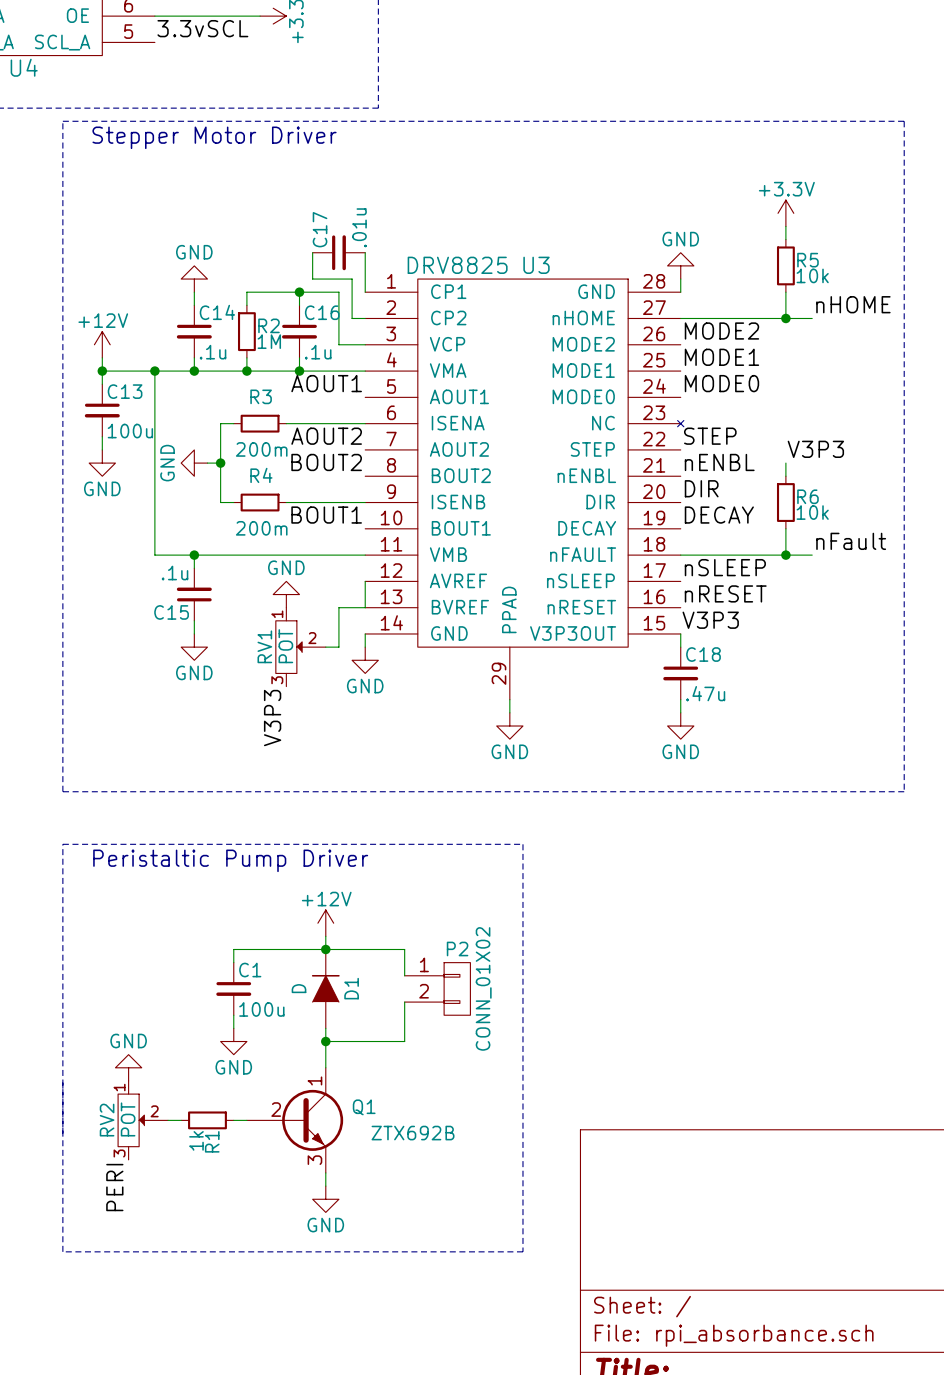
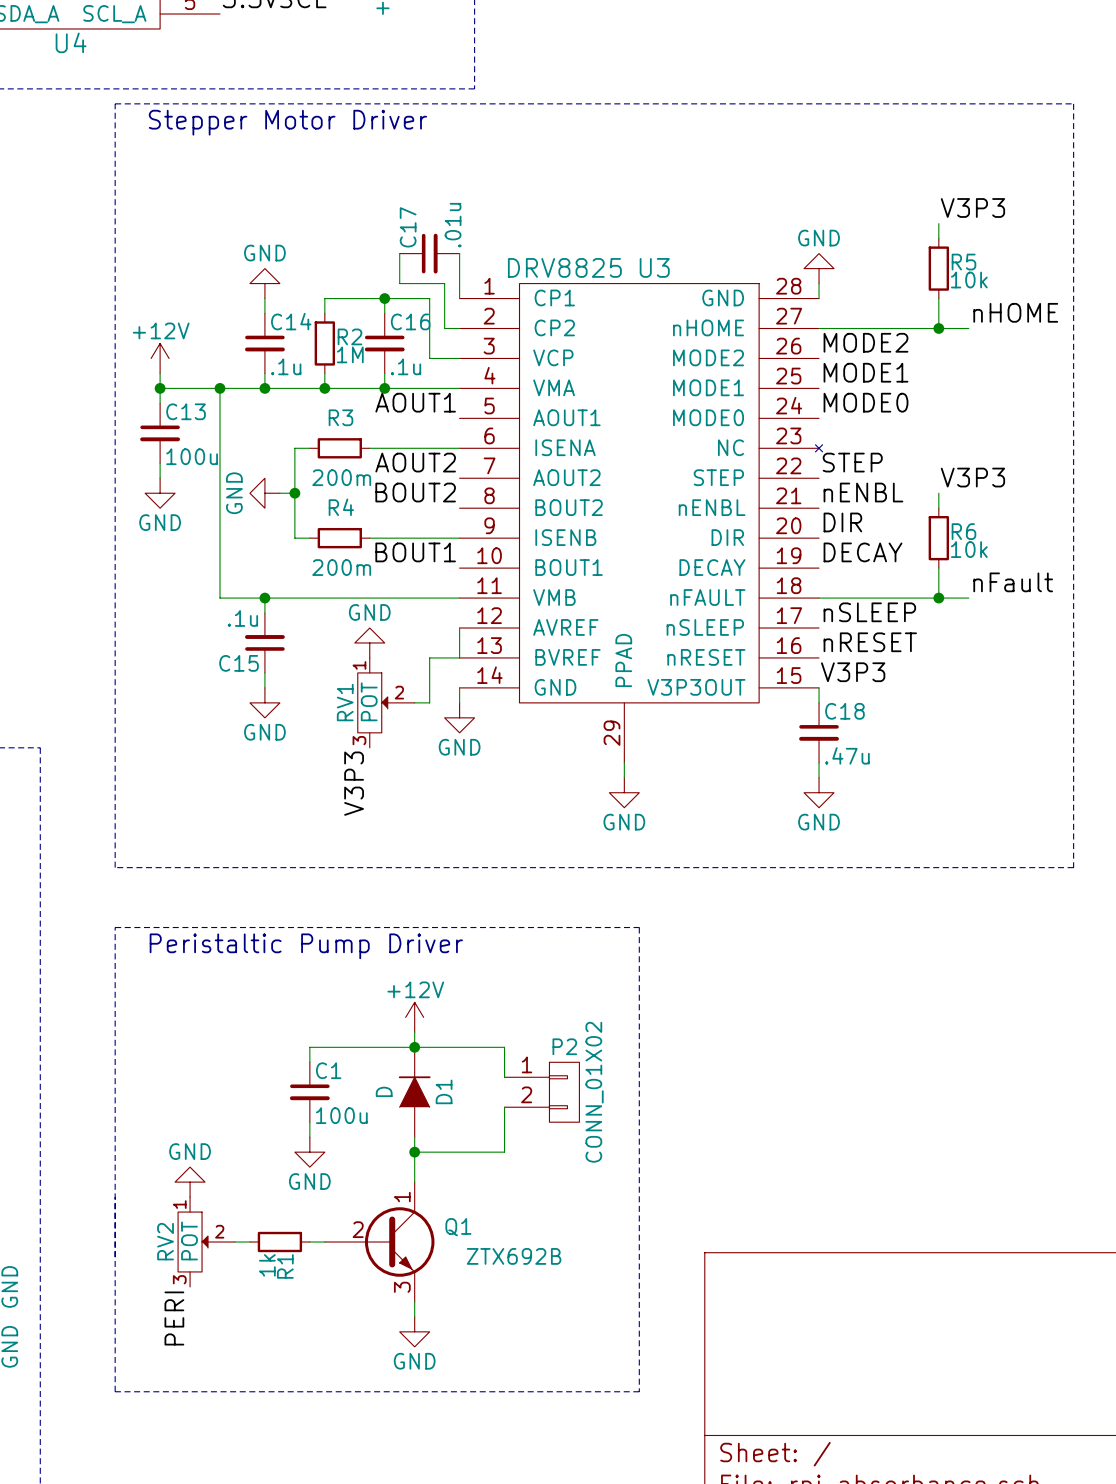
label: none -> V3P3 (972, 207)
power symbol: +3.3V (785, 213) -> none

